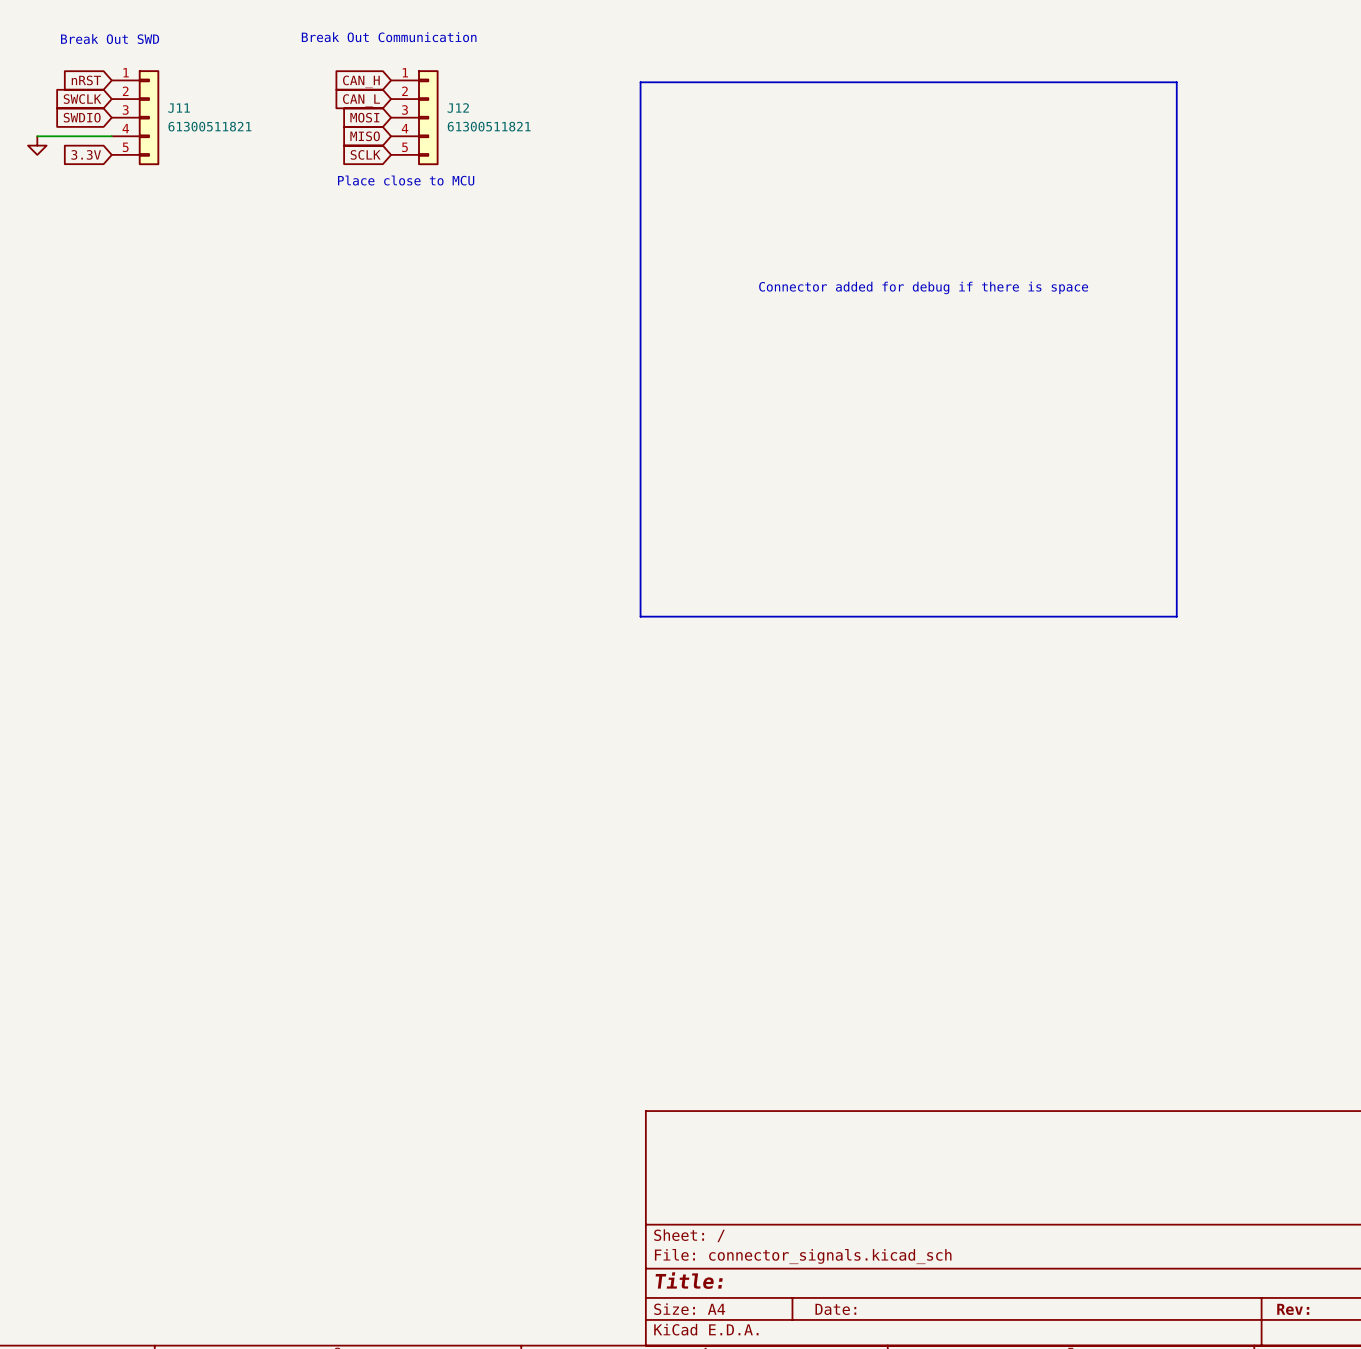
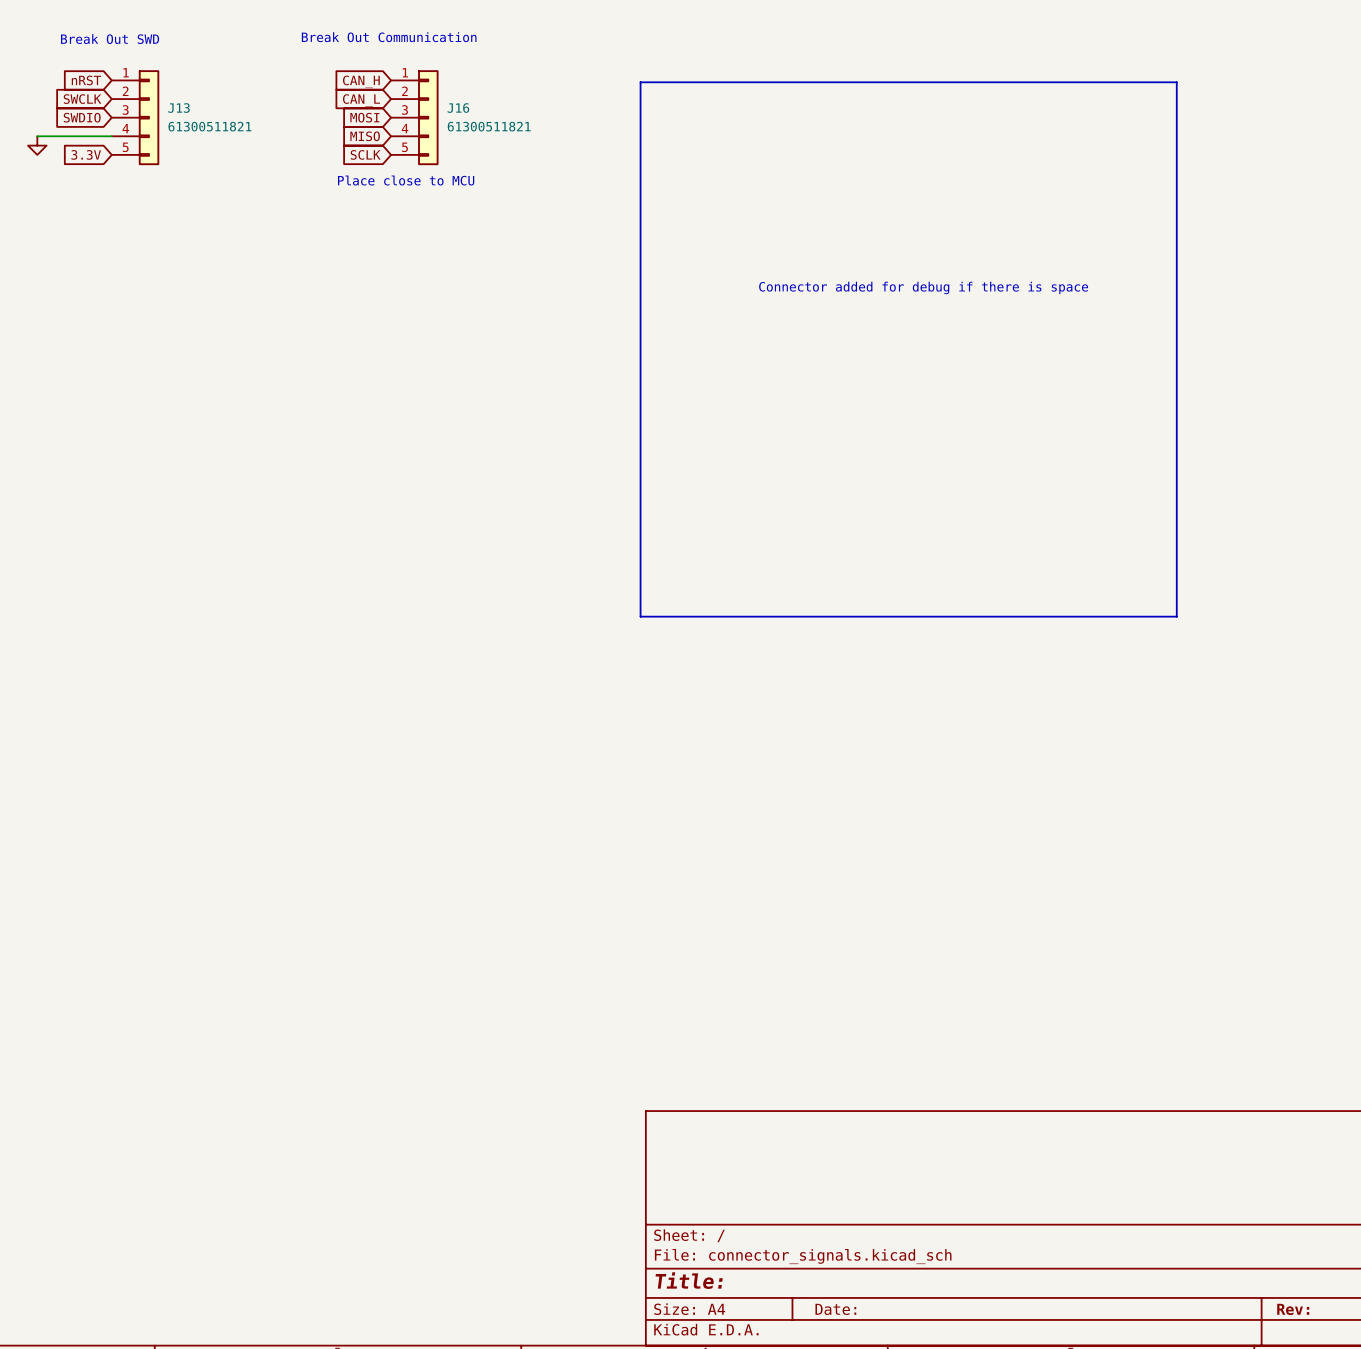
J11 name: J11 (179, 108) -> J13 (179, 108)
J12 name: J12 (458, 108) -> J16 (458, 108)

